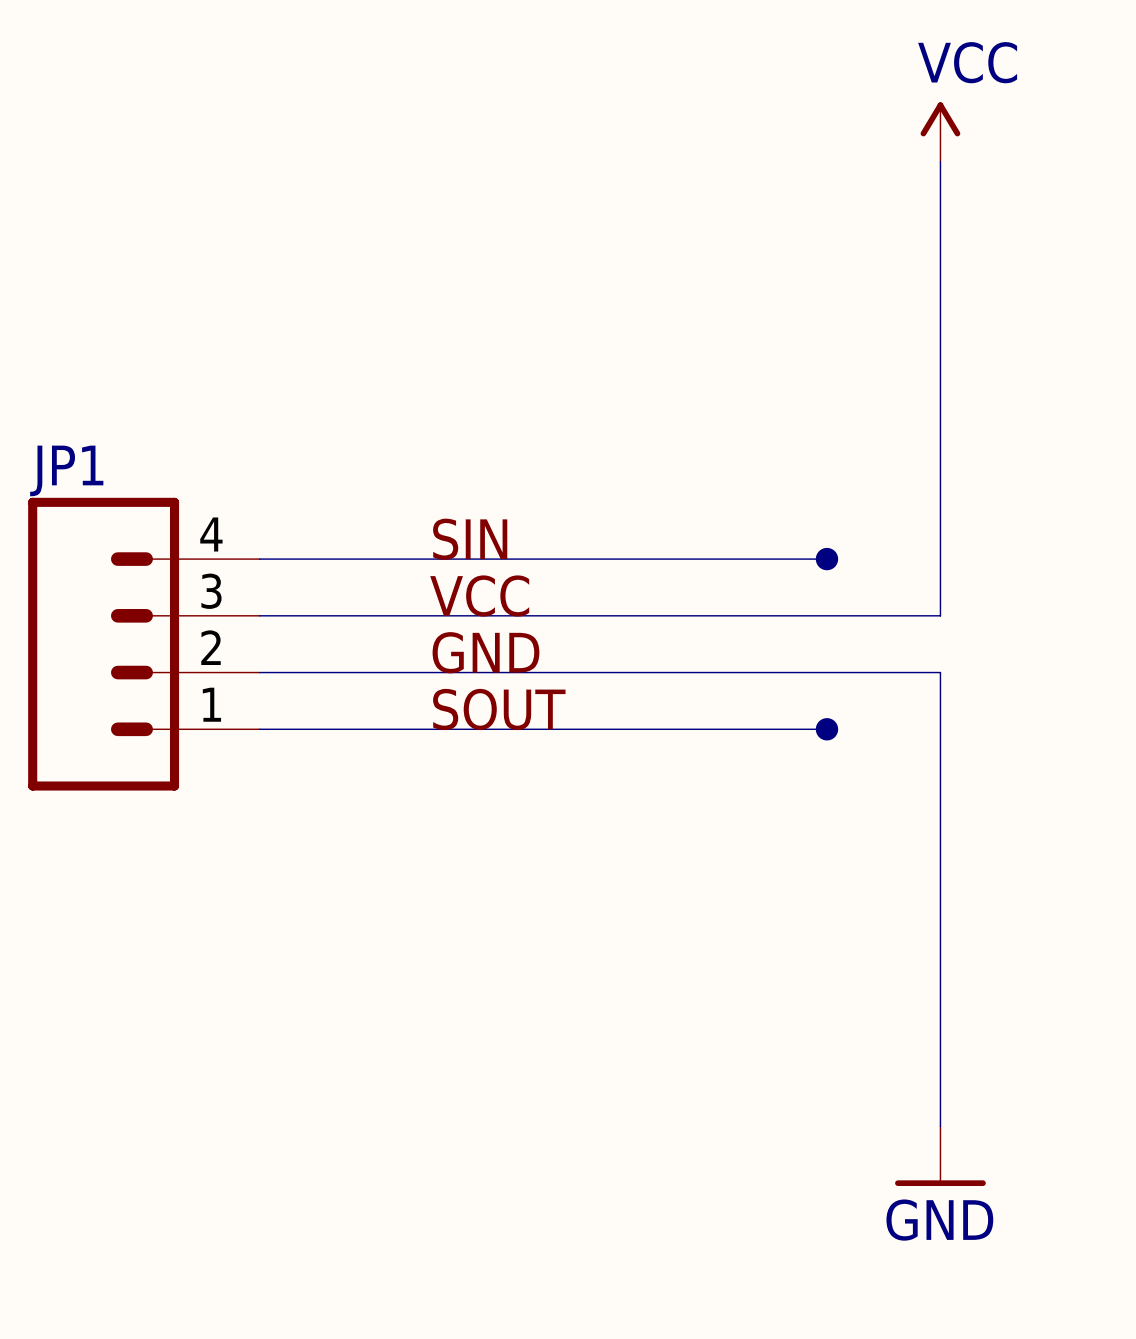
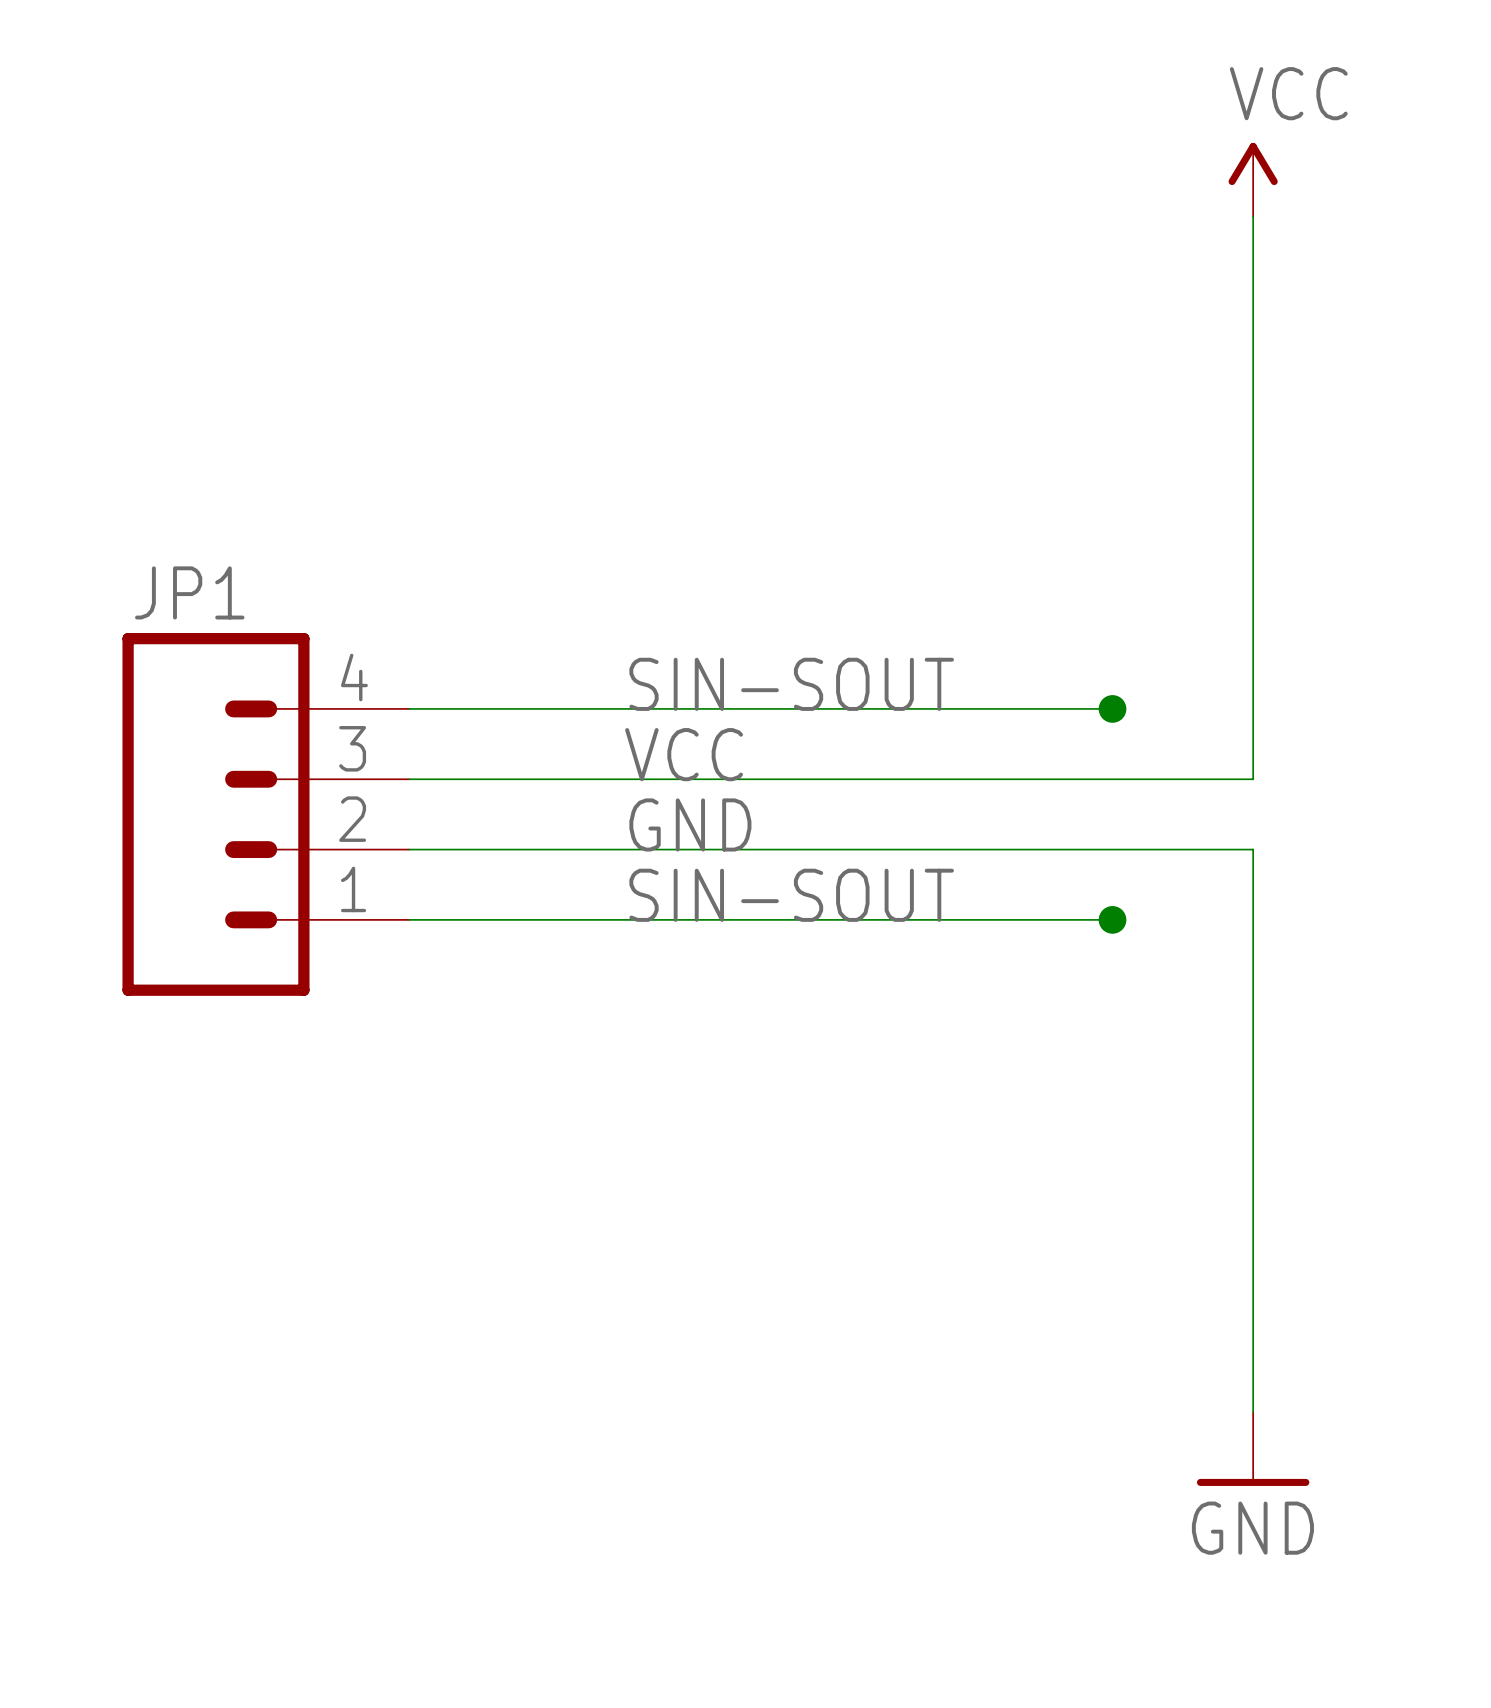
label: SIN (470, 539) -> SIN-SOUT (791, 684)
label: SOUT (499, 709) -> SIN-SOUT (791, 895)

